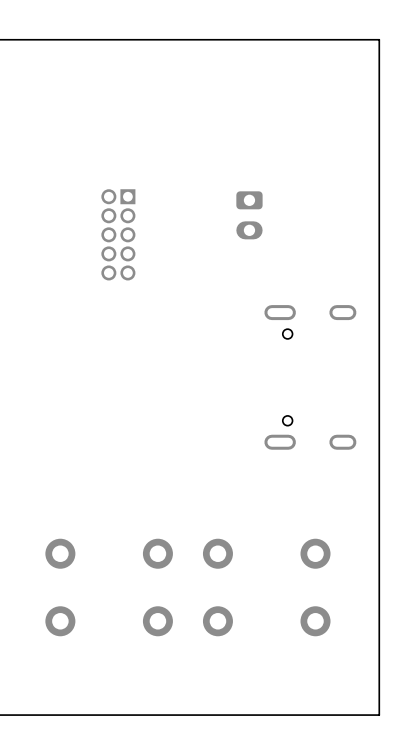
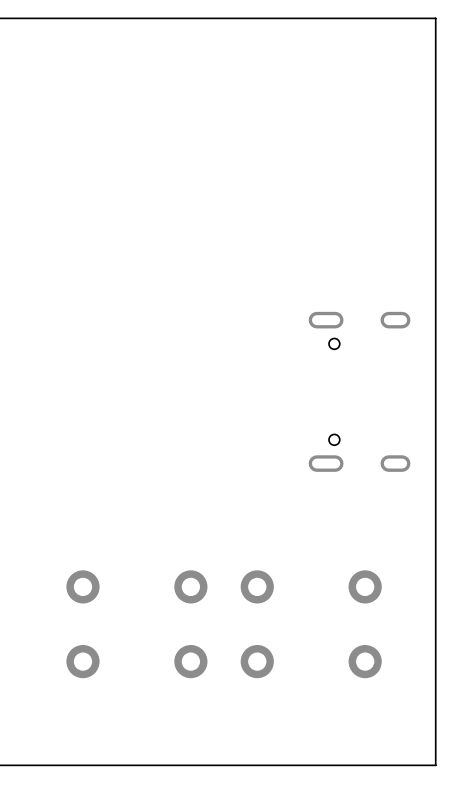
part: (249, 215) -> none
part: (118, 234) -> none

